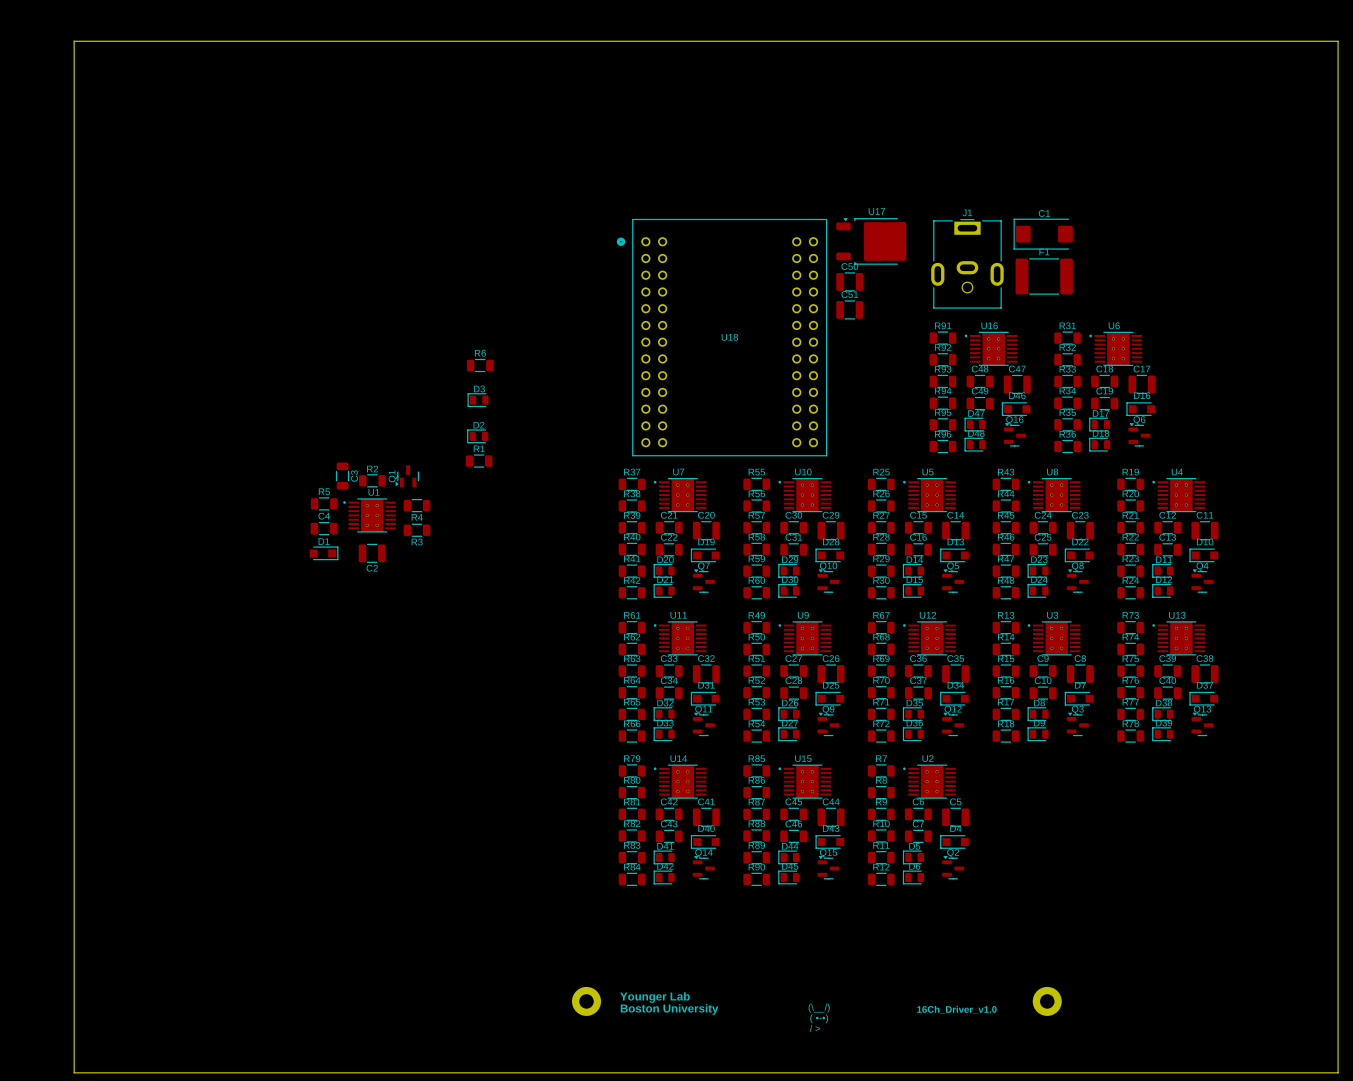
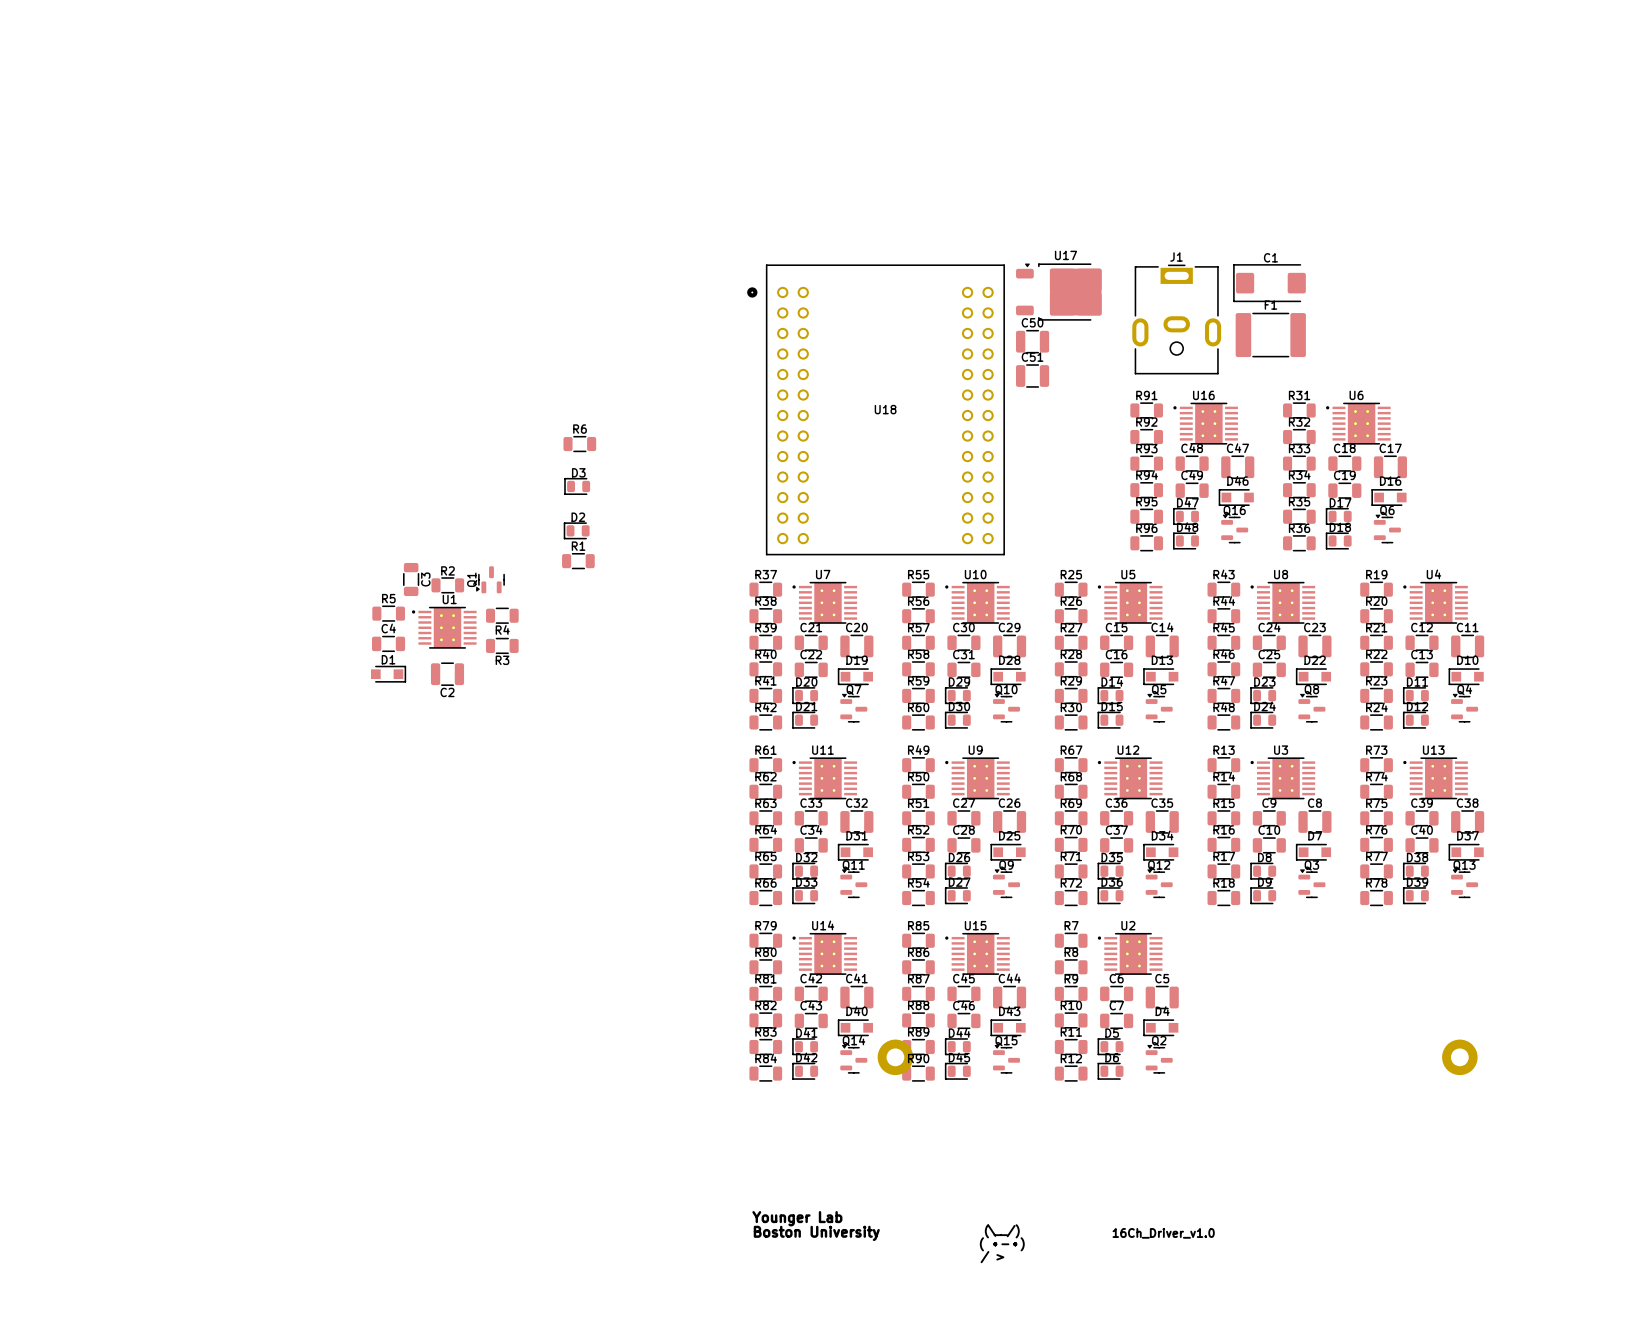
board edge: (74, 41) (1338, 41) (1338, 1072) (74, 1072) (74, 41) -> none
part: none -> (895, 1057)
part: none -> (1459, 1057)
part: (586, 1001) -> none
part: (1047, 1001) -> none

